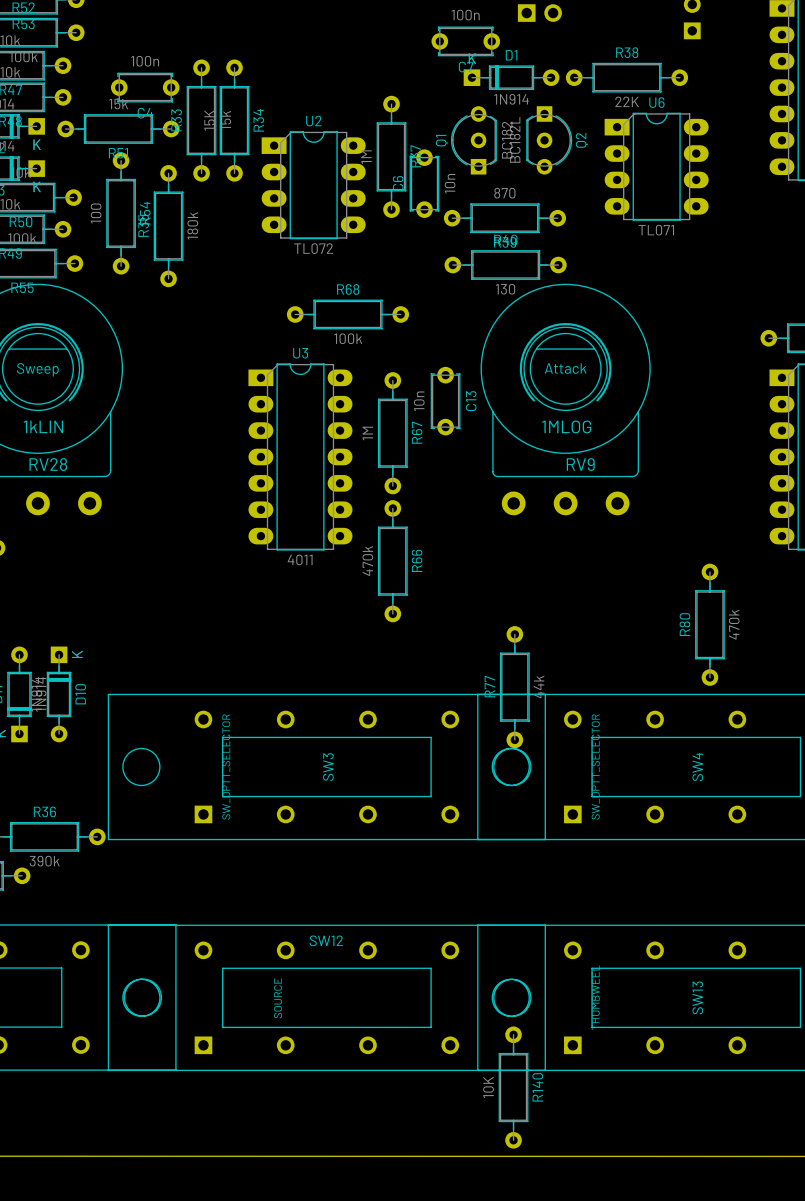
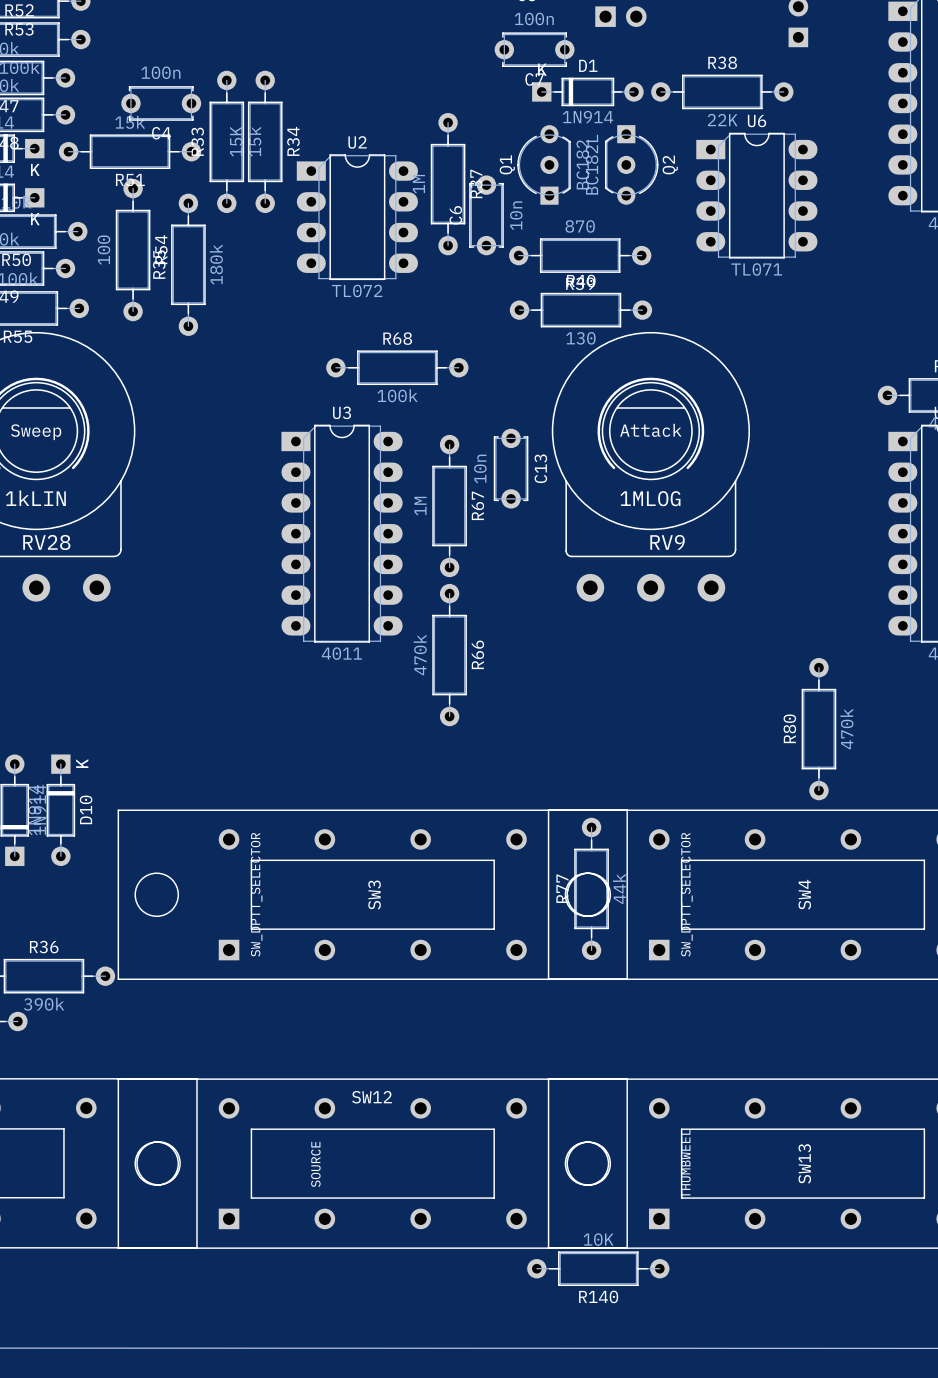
R77 position: (514, 687) -> (591, 888)
R140 rotation: 0° (513, 1087) -> 90° clockwise (598, 1268)

